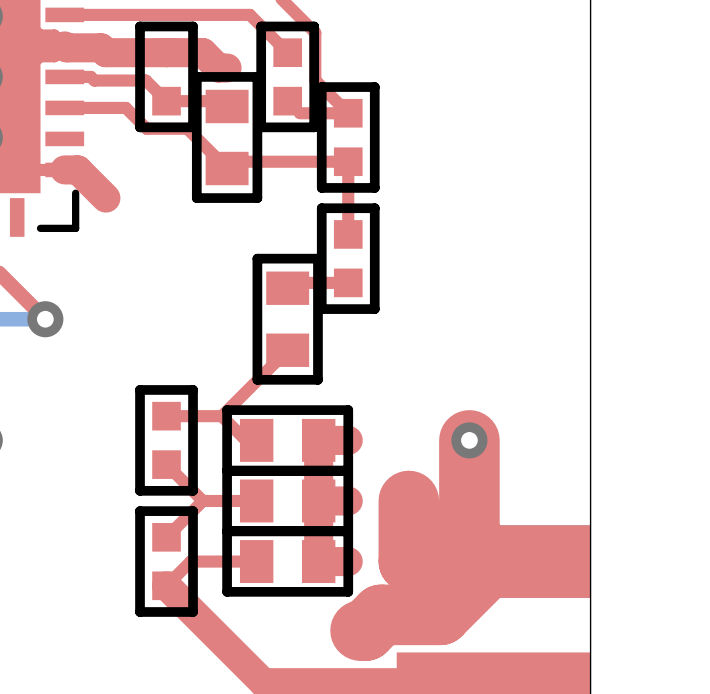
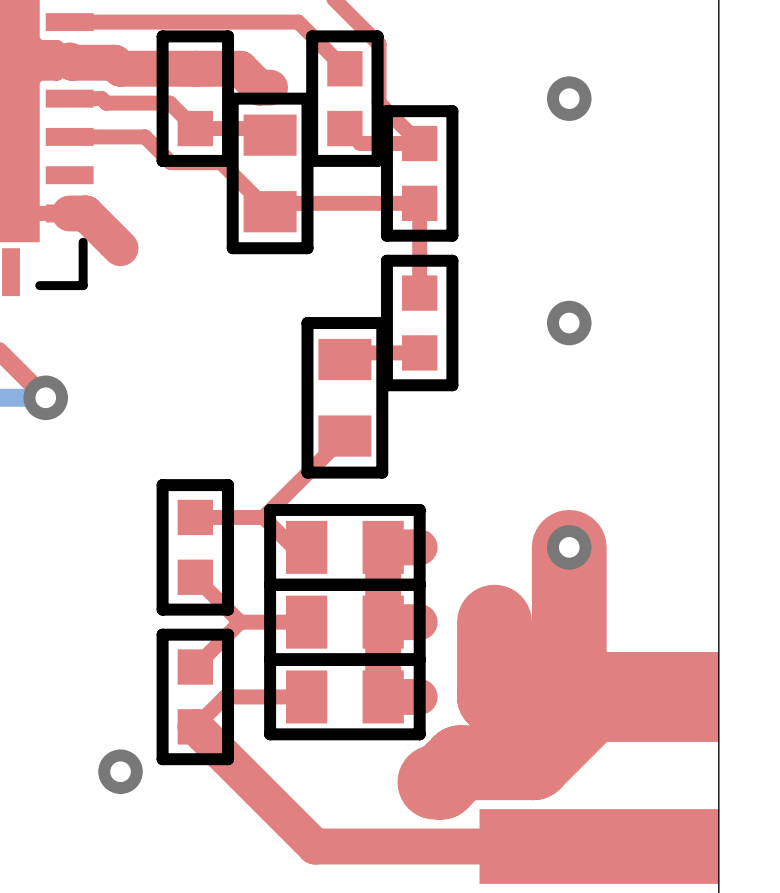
via: none -> (569, 98)
via: none -> (569, 323)
via: none -> (120, 771)

